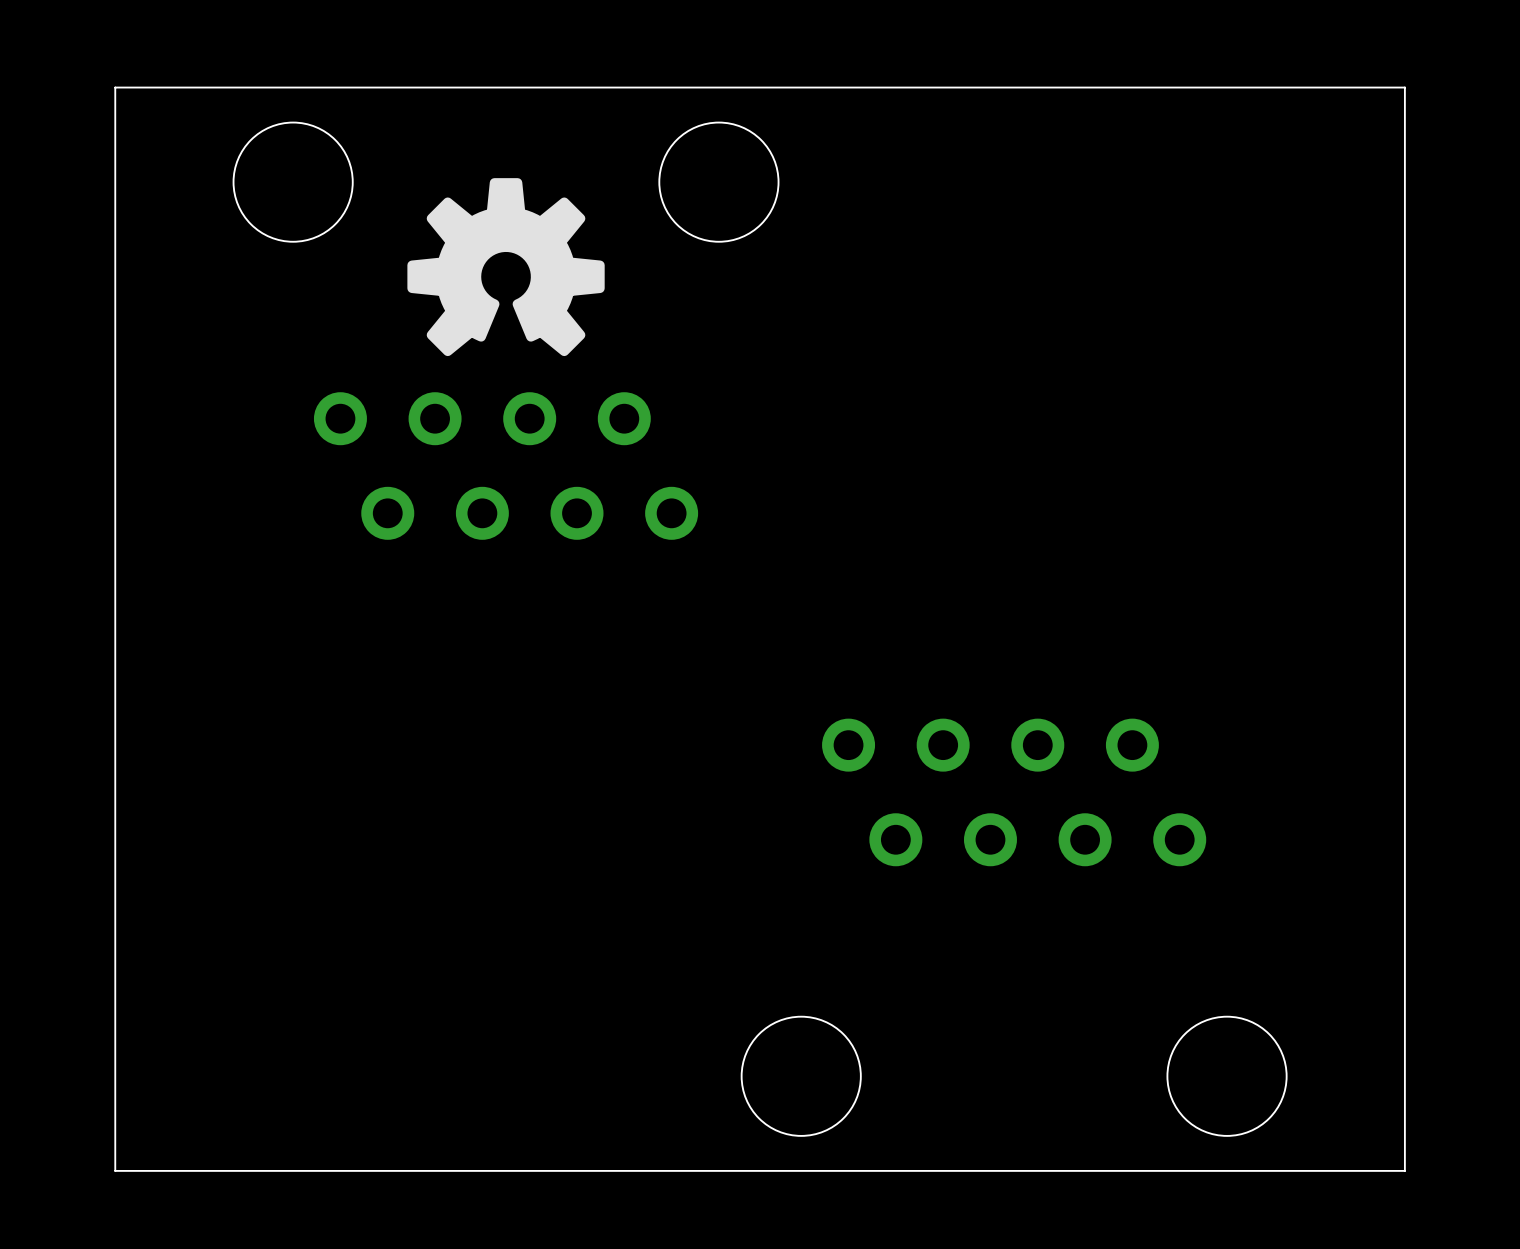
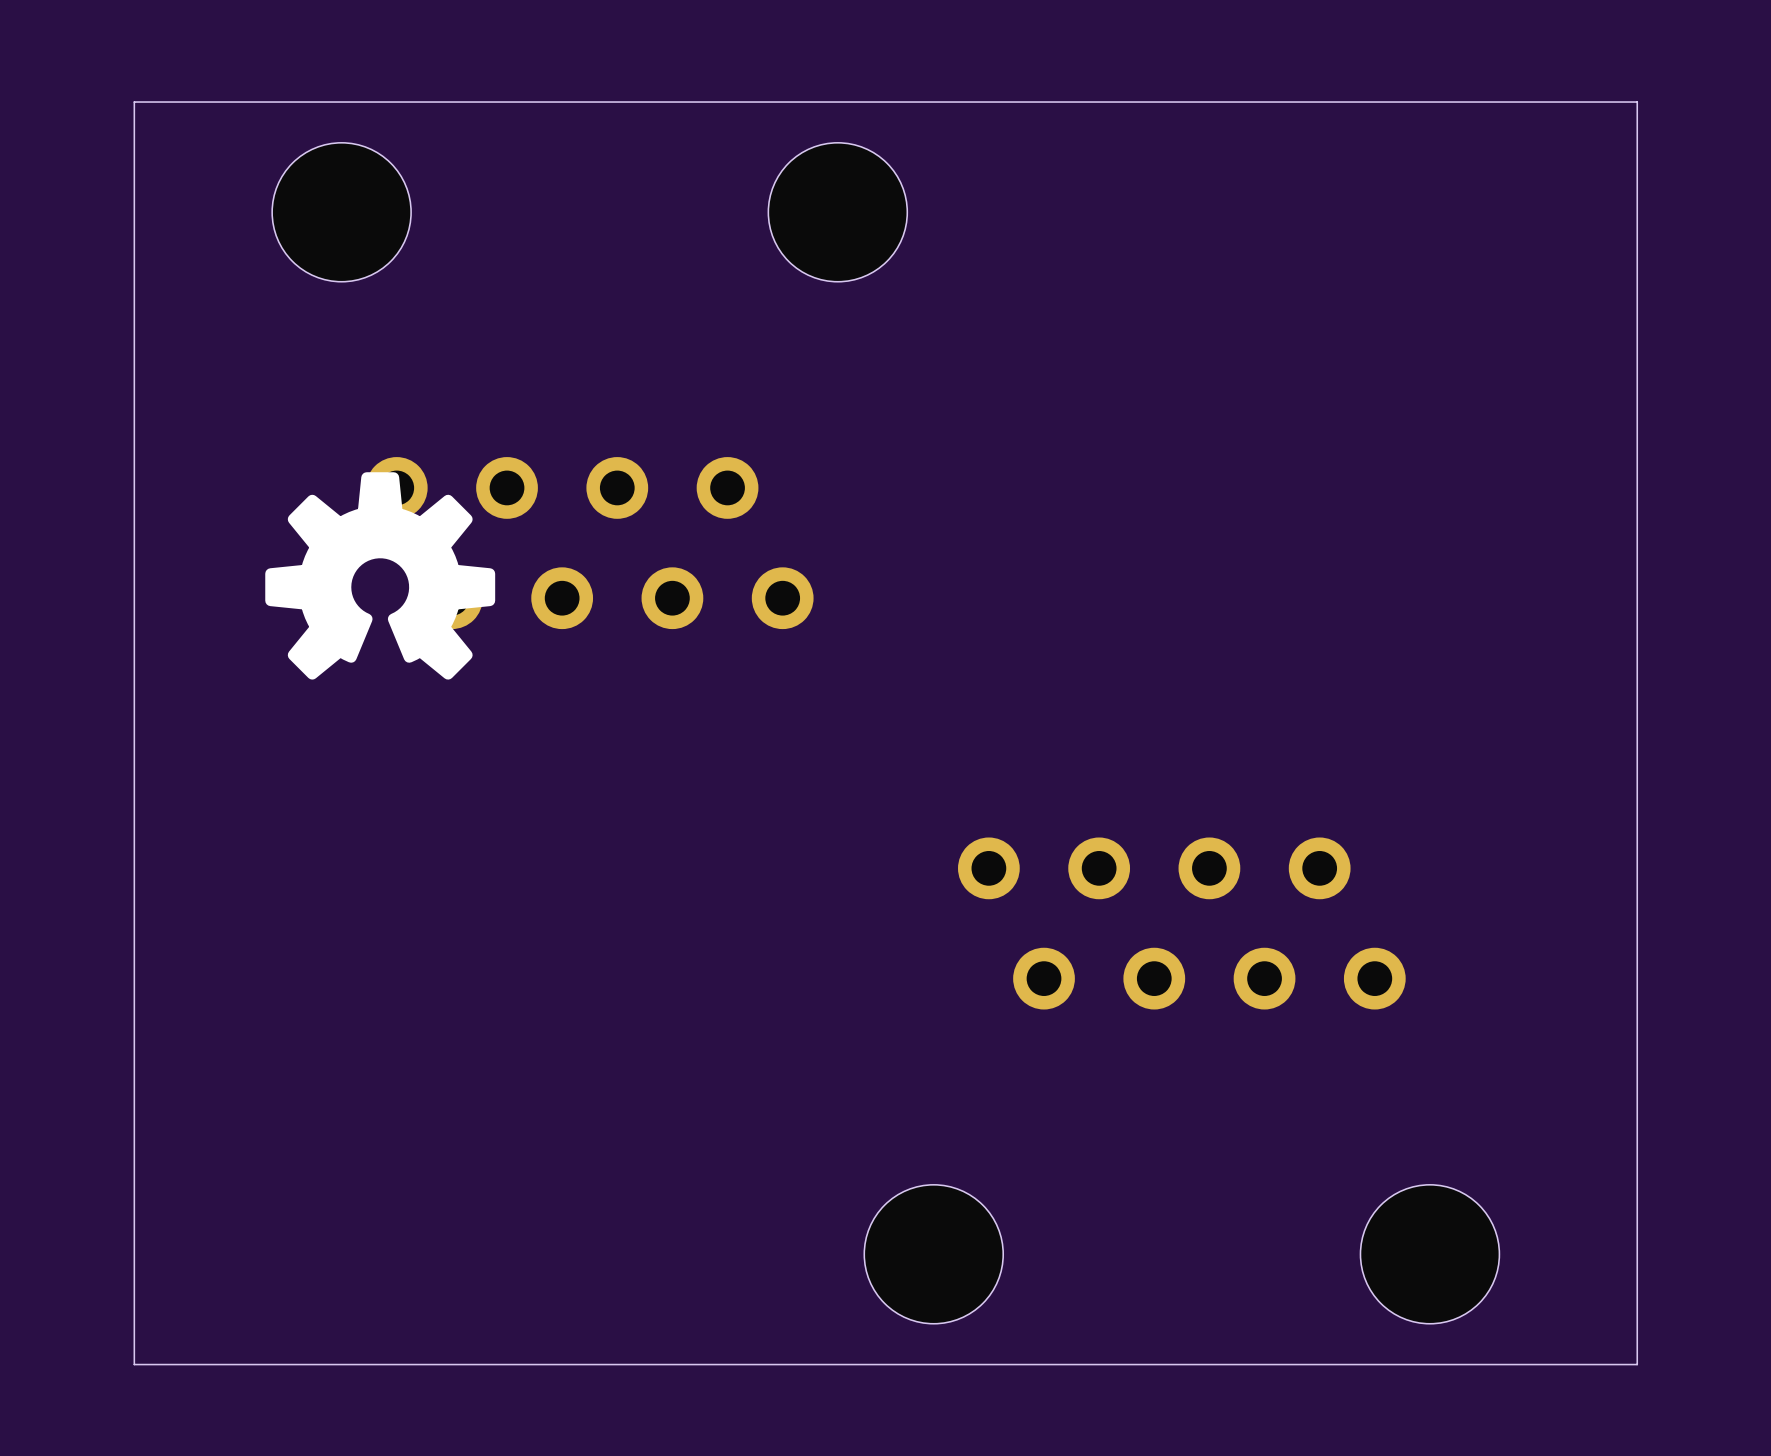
drawing position: (506, 267) -> (380, 575)

